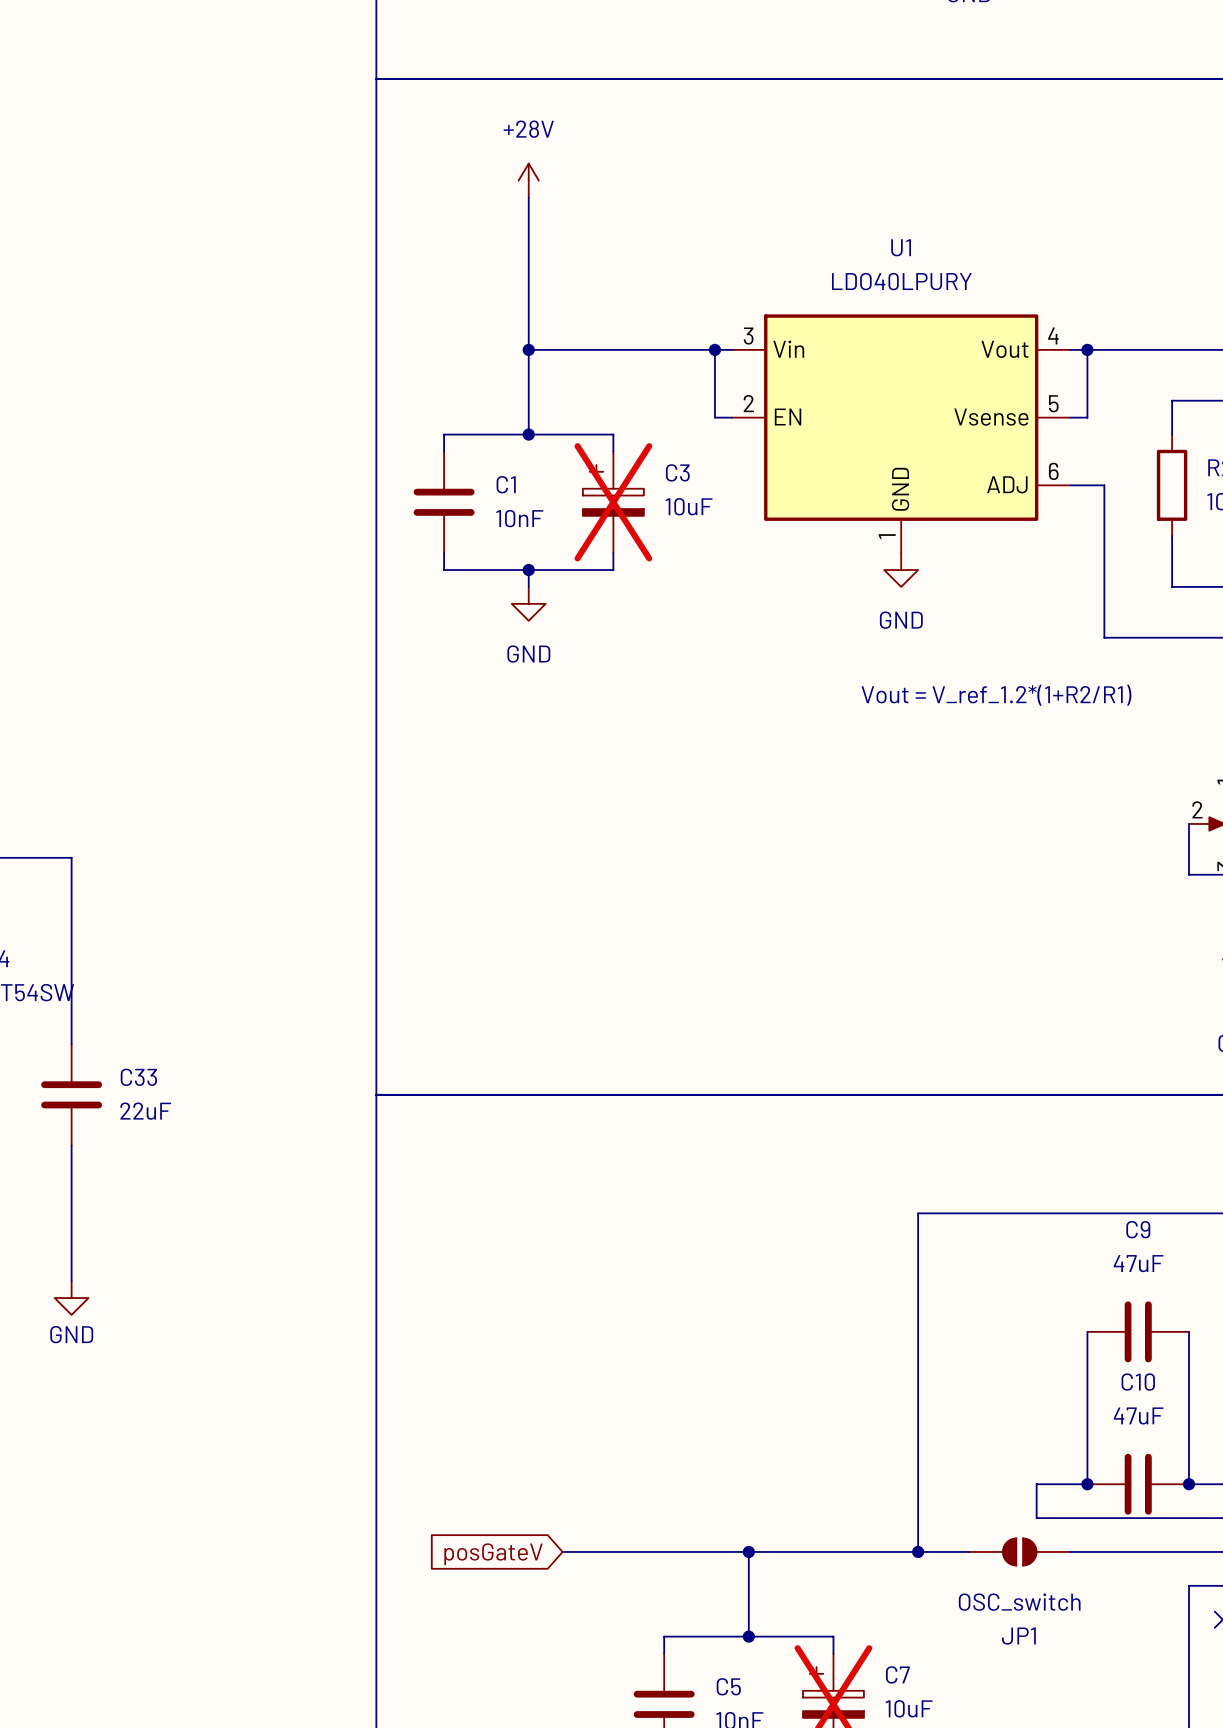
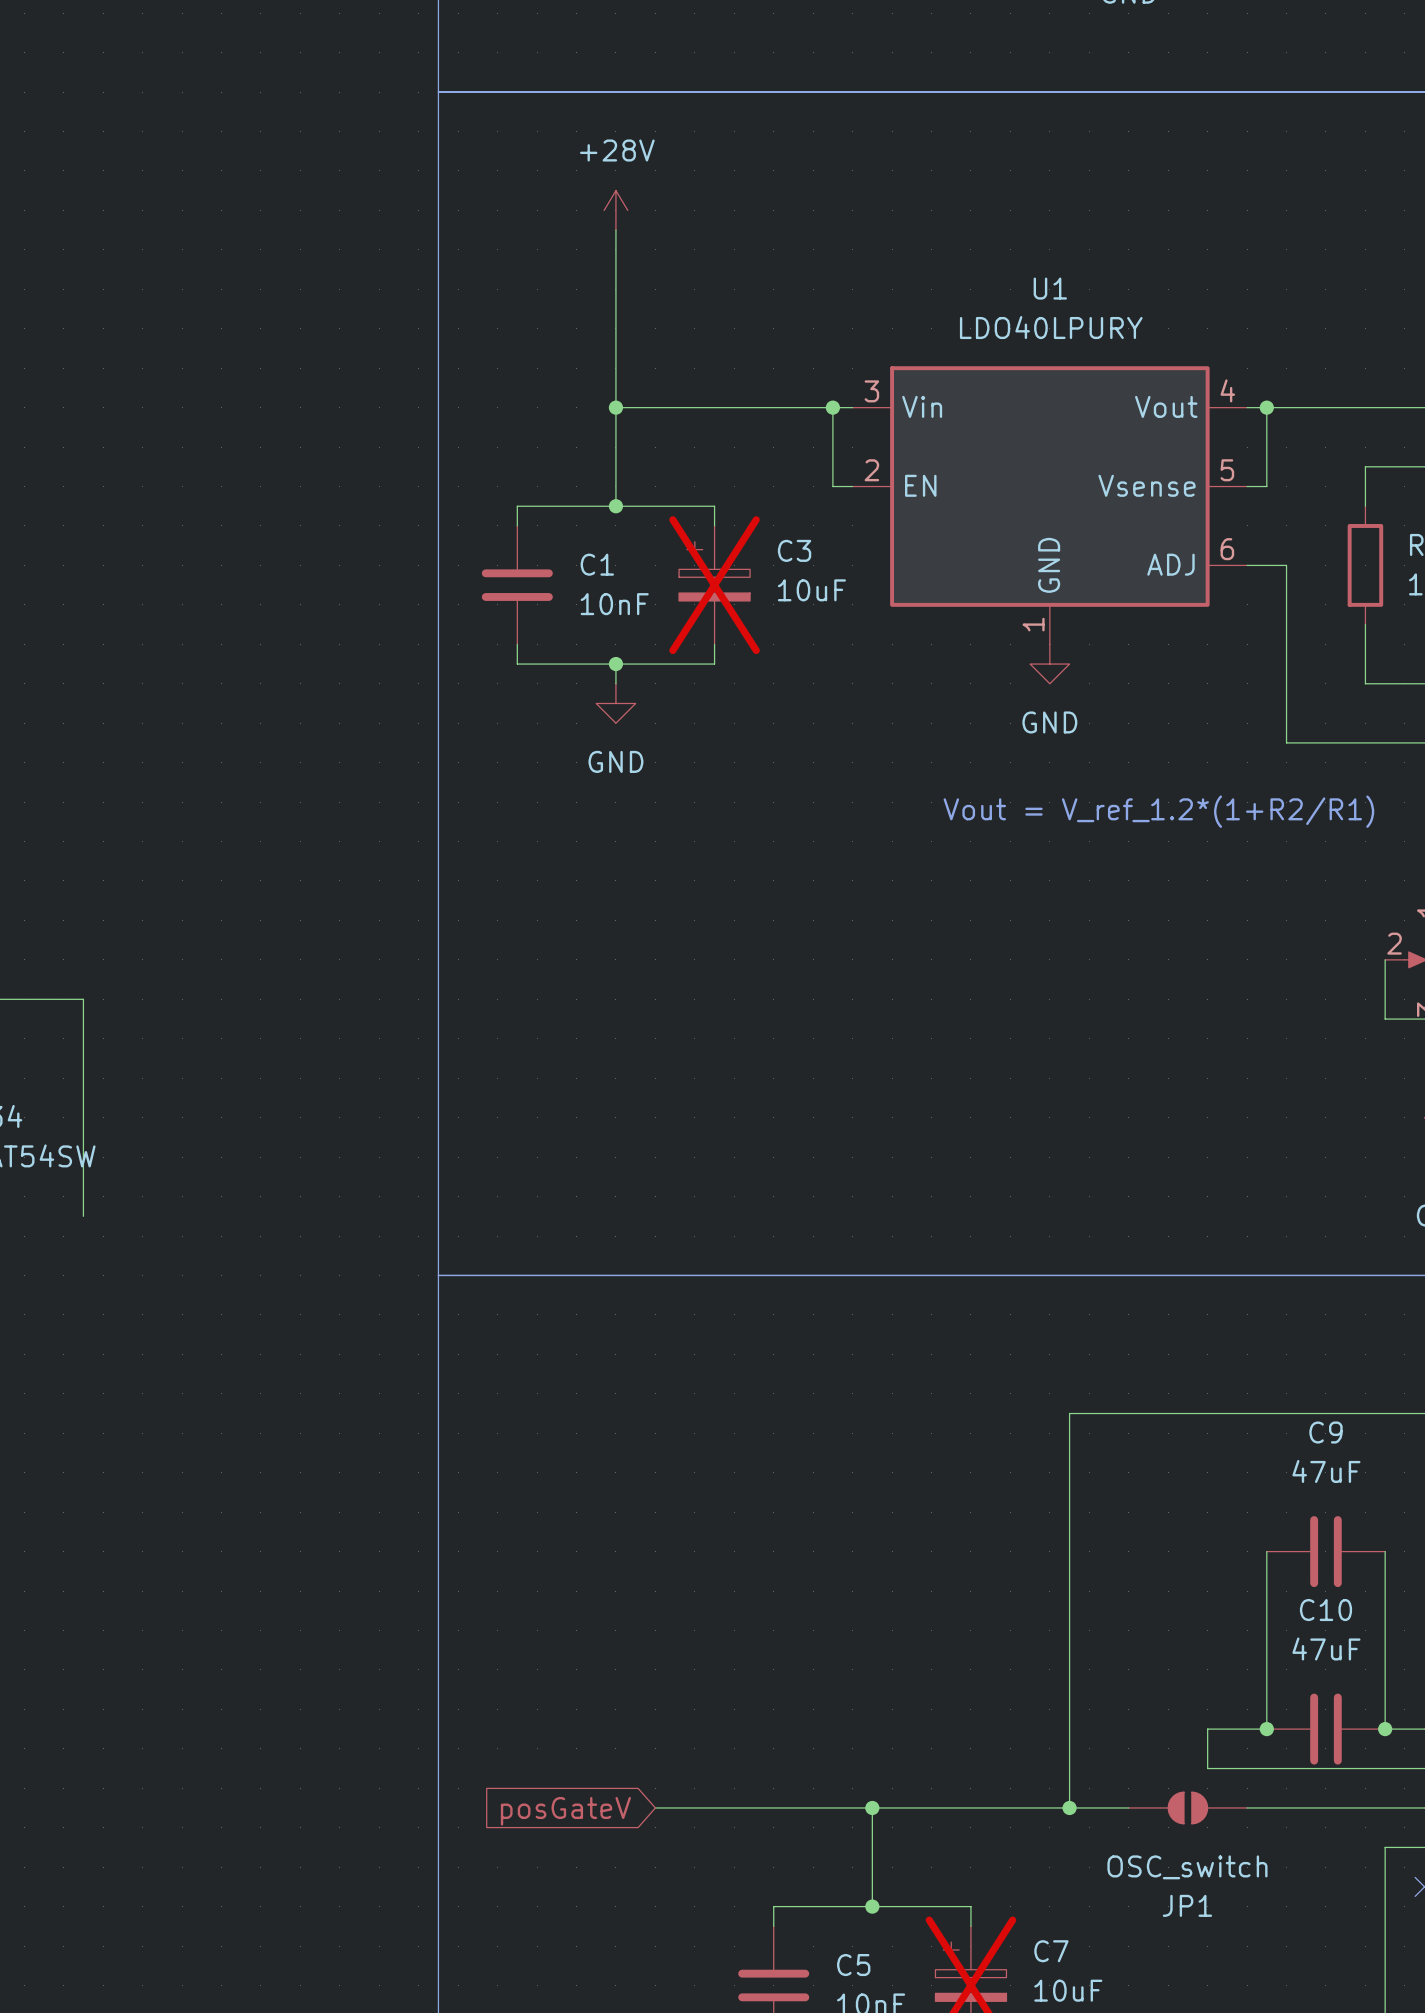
C33: 22uF (71, 1094) -> none
wire: (71, 1145) (71, 1281) -> none
power symbol: GND (71, 1298) -> none

